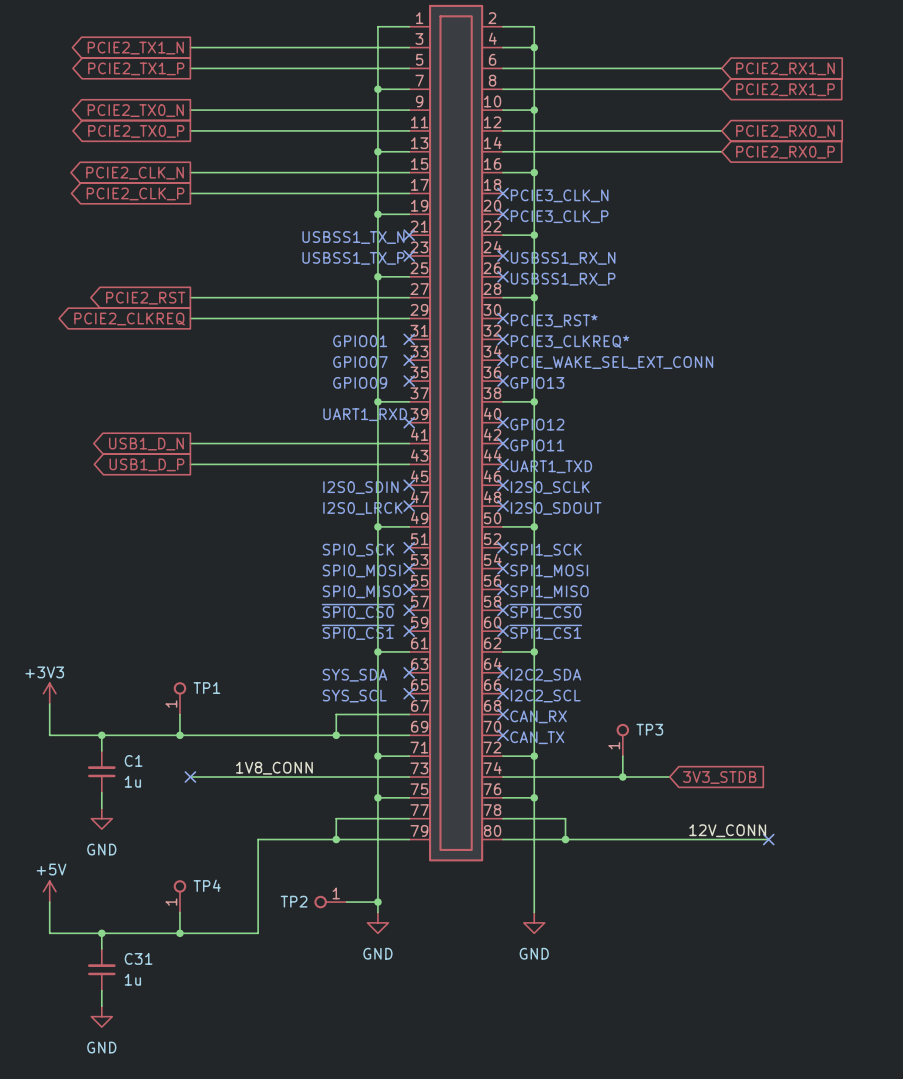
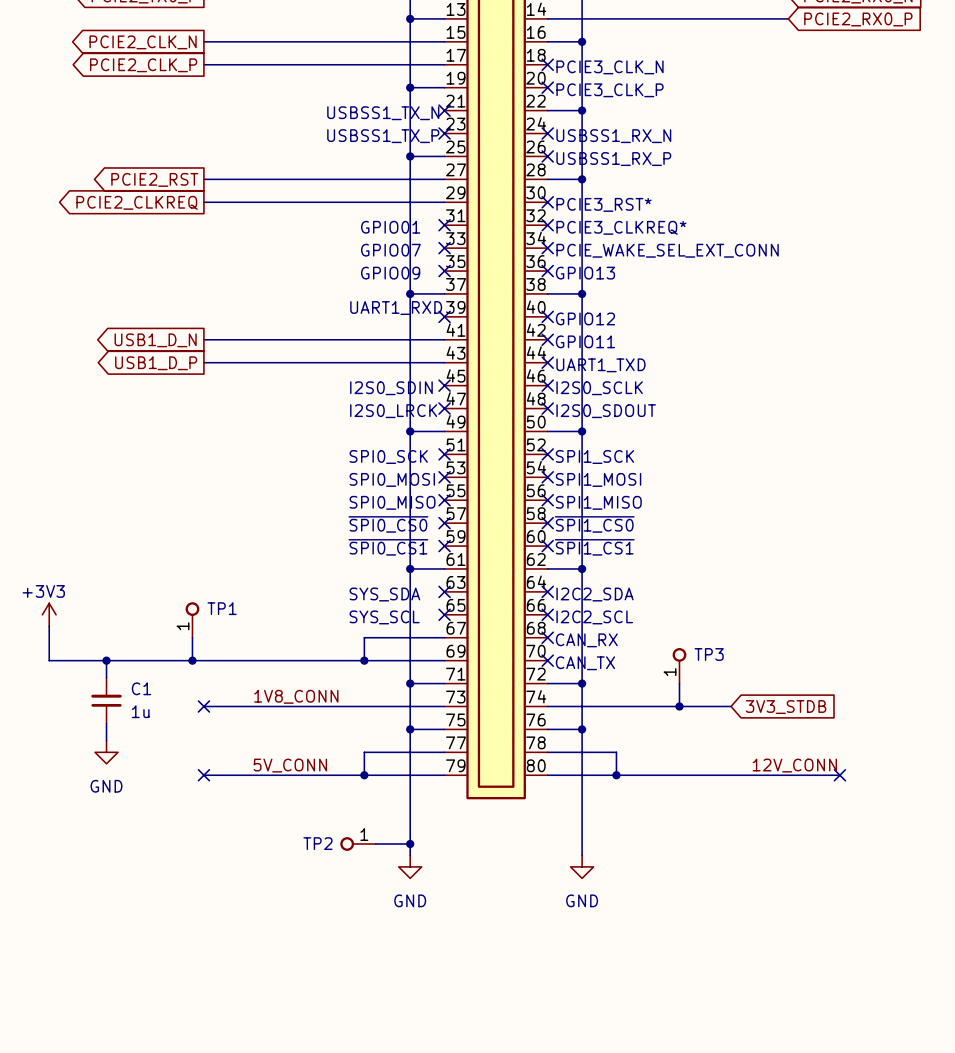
label: none -> 5V_CONN (290, 765)
no-connect mark: none -> (203, 775)
wire: (258, 839) (258, 933) (49, 933) (49, 902) -> (278, 775) (203, 775)
power symbol: +5V (49, 891) -> none
TP4: (179, 896) -> none
wire: (179, 912) (179, 933) -> none
wire: (101, 933) (101, 948) -> none
junction: (101, 933) -> none
junction: (179, 933) -> none
C31: (101, 969) -> none
wire: (101, 990) (101, 1006) -> none
power symbol: GND (101, 1016) -> none

